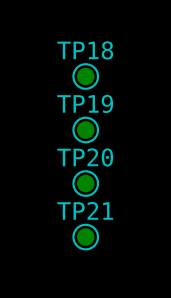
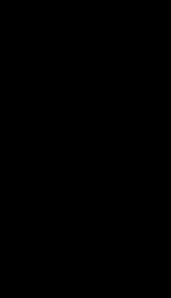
TP18: (85, 76) -> none
TP19: (85, 130) -> none
TP20: (85, 183) -> none
TP21: (85, 237) -> none

